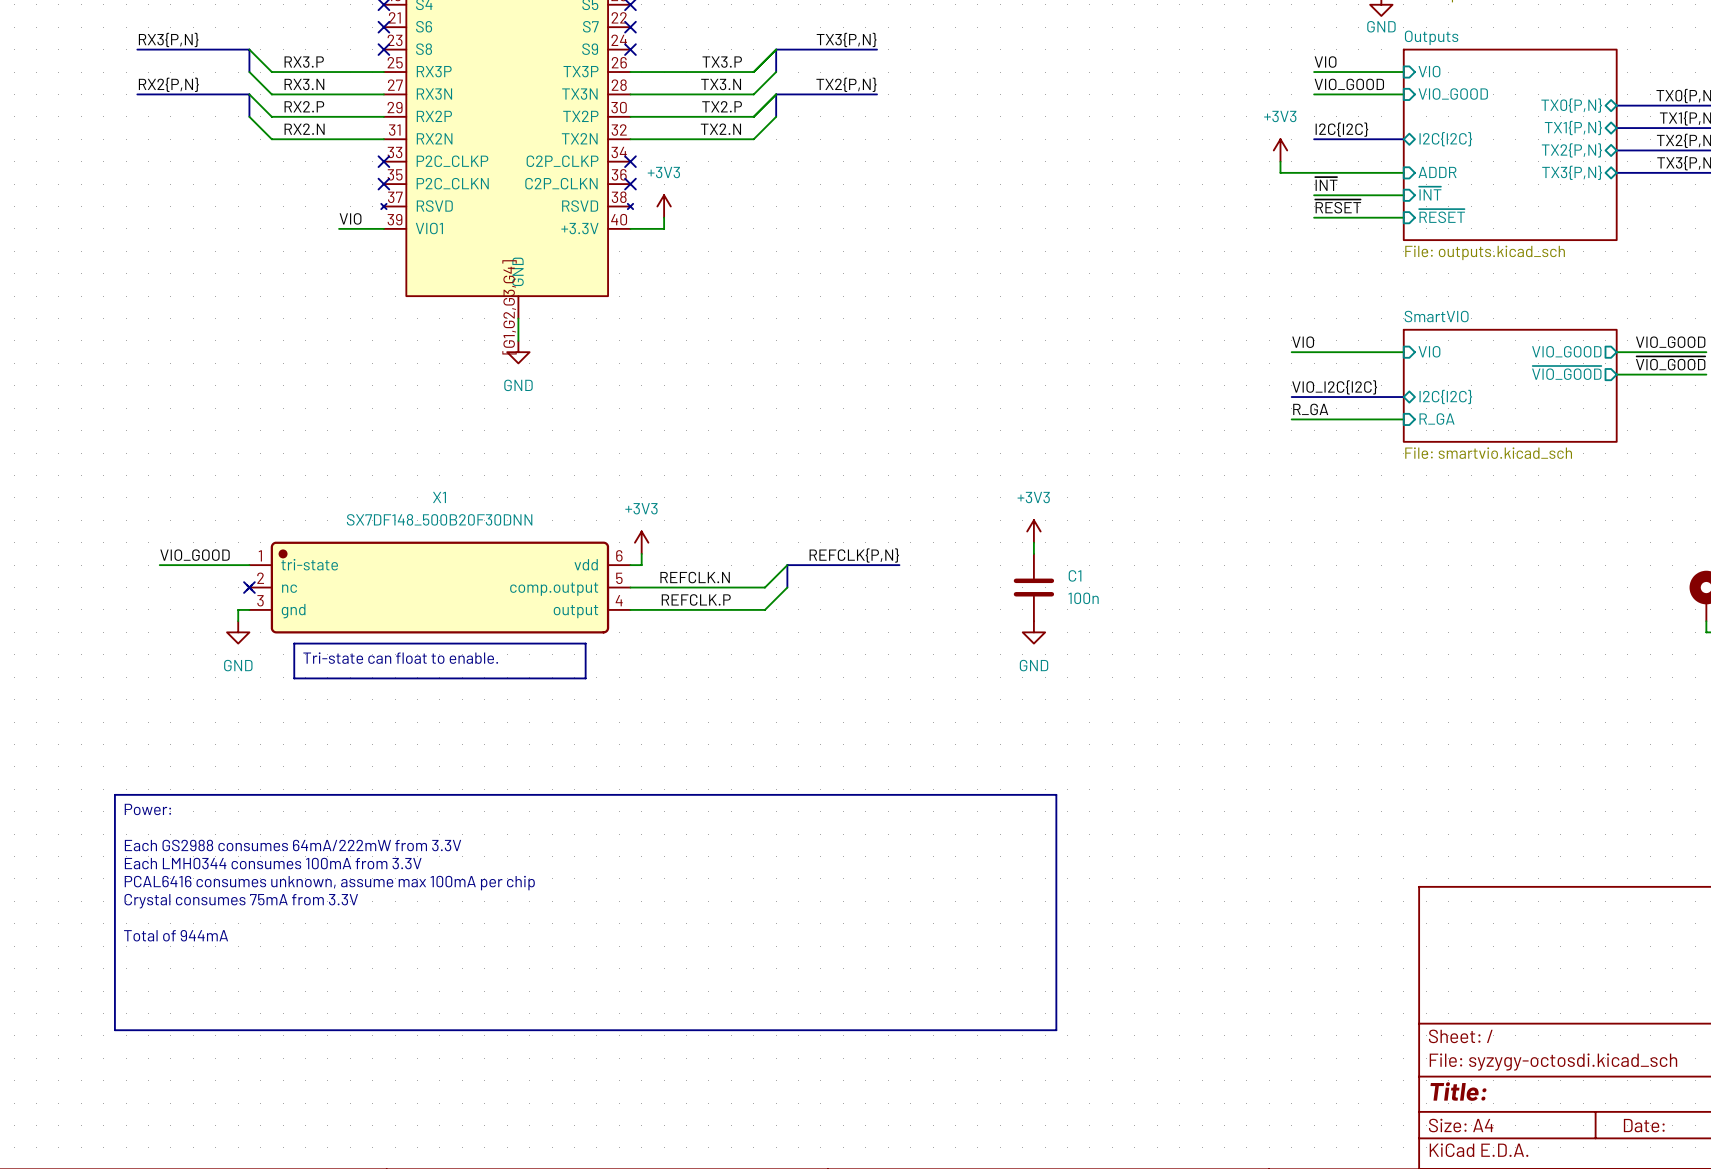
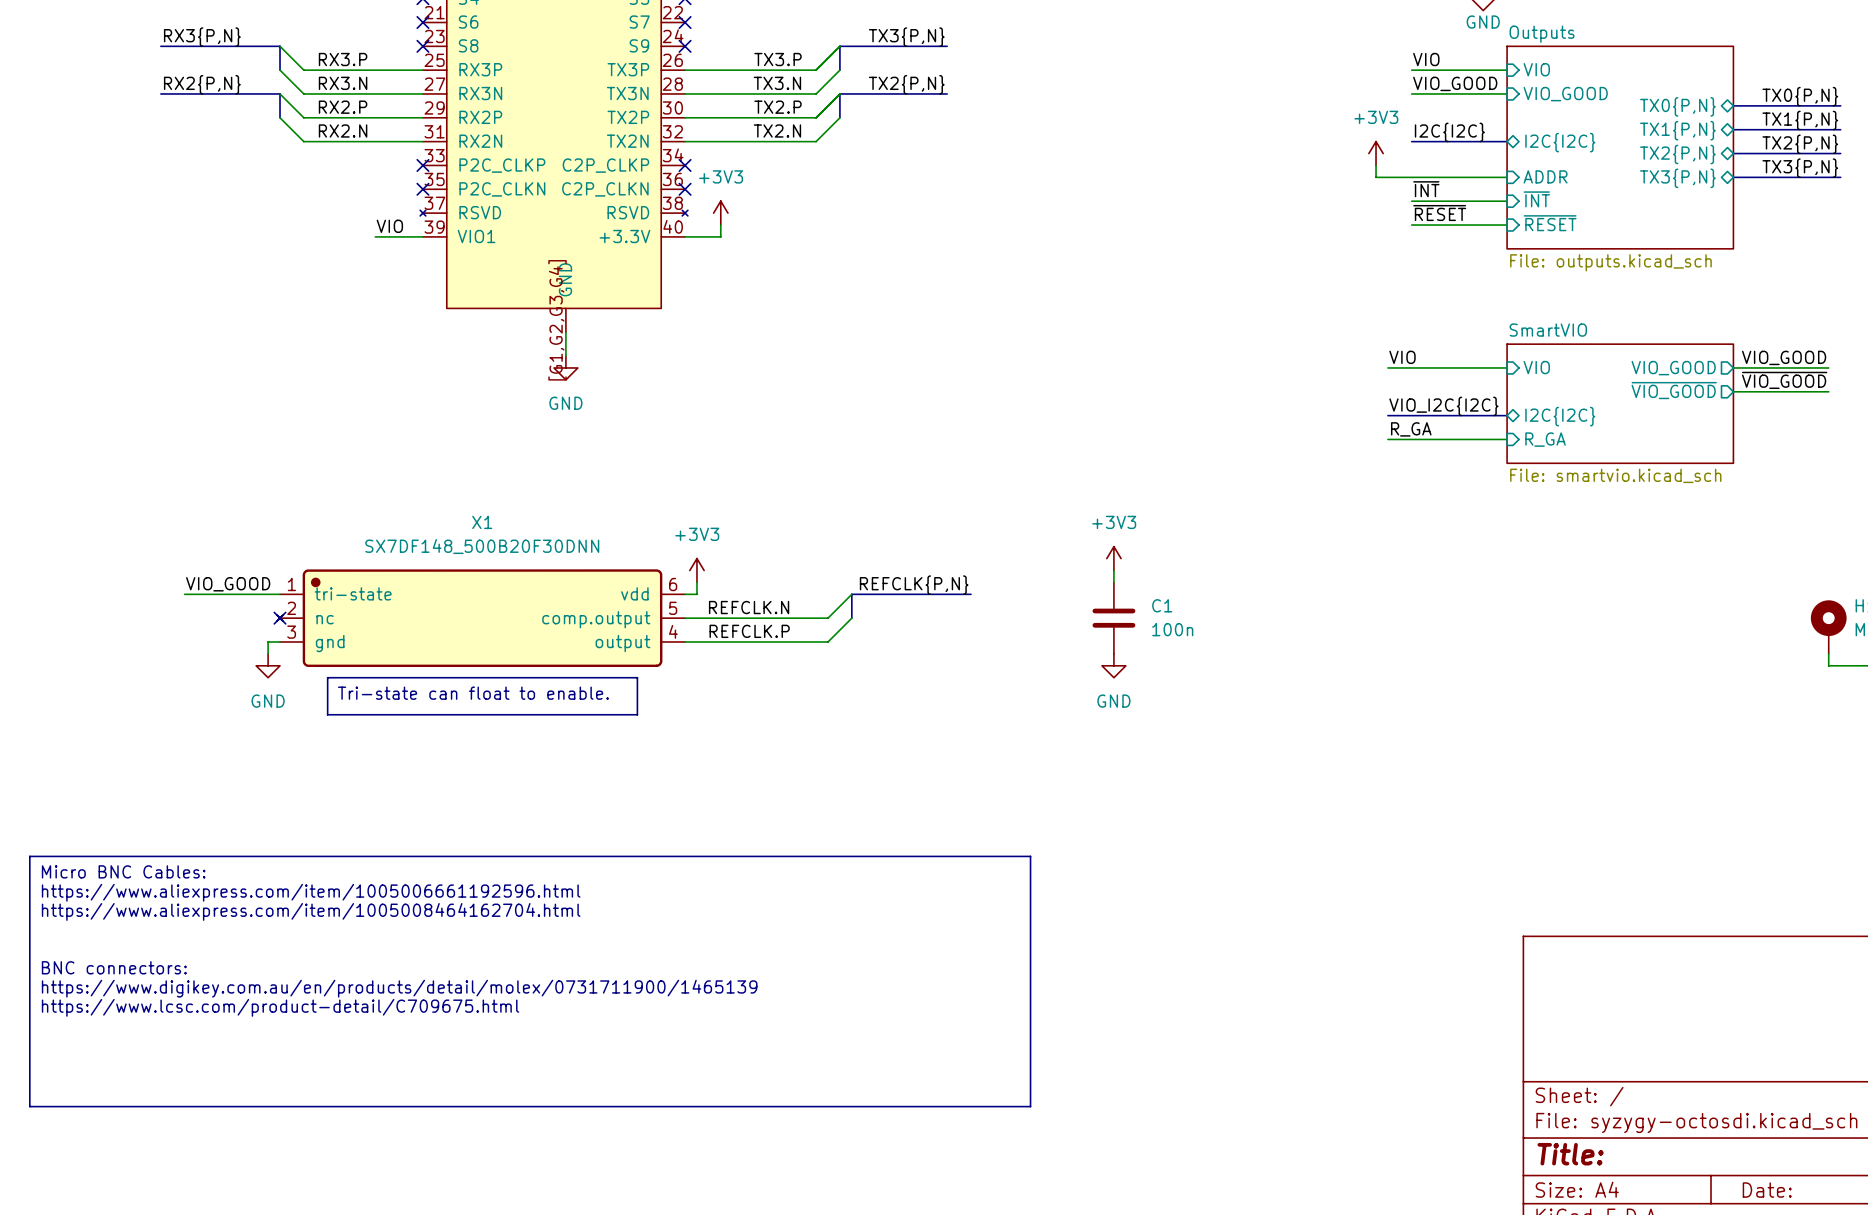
line: (114, 794) (1056, 794) (1056, 1030) (114, 1030) (114, 794) -> (29, 856) (1030, 856) (1030, 1106) (29, 1106) (29, 856)
text: Power: (147, 809) -> none
text: none -> Micro BNC Cables: (123, 871)
text: none -> https://www.aliexpress.com/item/1005006661192596.html (311, 892)
text: Each GS2988 consumes 64mA/222mW from 3.3V (293, 845) -> none
text: none -> https://www.aliexpress.com/item/1005008464162704.html (311, 911)
text: Each LMH0344 consumes 100mA from 3.3V (273, 863) -> none
text: PCAL6416 consumes unknown, assume max 100mA per chip (329, 883) -> none
text: Crystal consumes 75mA from 3.3V (241, 901) -> none
text: none -> BNC connectors: (114, 967)
text: Total of 944mA (176, 935) -> none
text: none -> https://www.digikey.com.au/en/products/detail/molex/0731711900/1465139 (399, 988)
text: none -> https://www.lcsc.com/product-detail/C709675.html (280, 1007)

